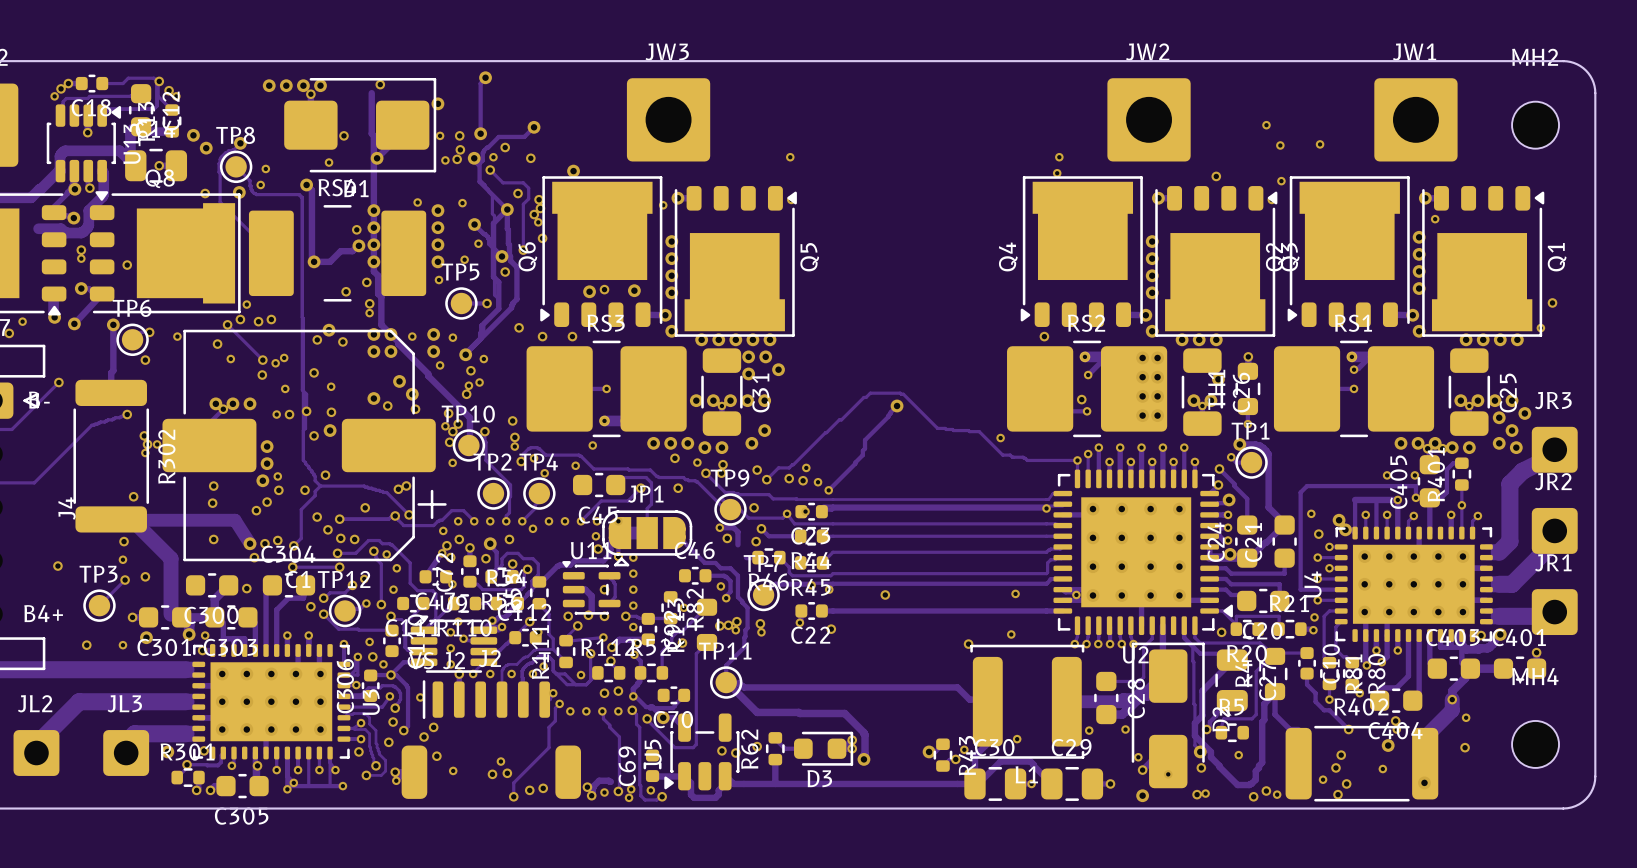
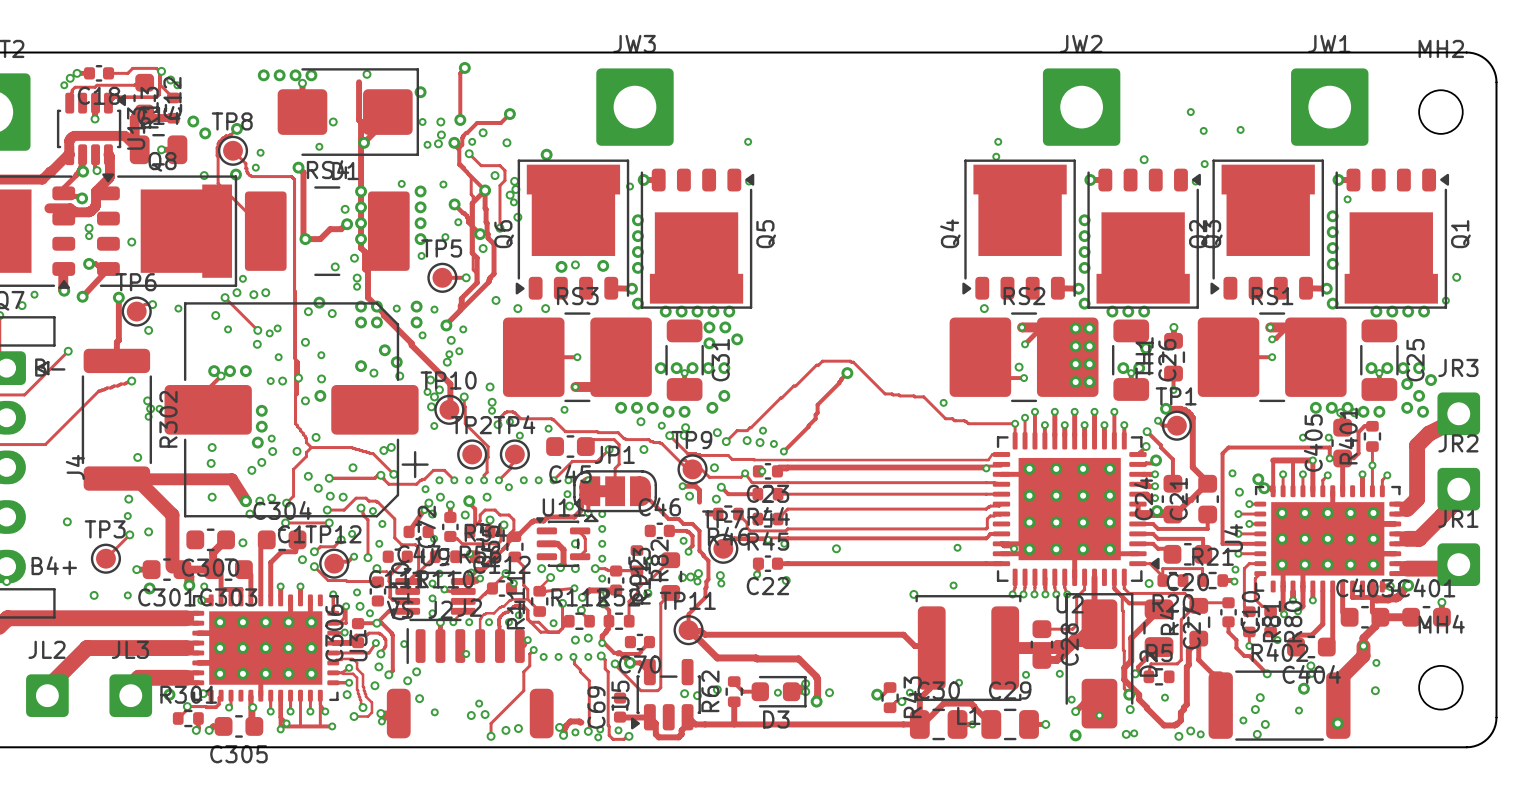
via: none -> (470, 553)
via: none -> (466, 653)
via: none -> (777, 692)
via: none -> (829, 692)

